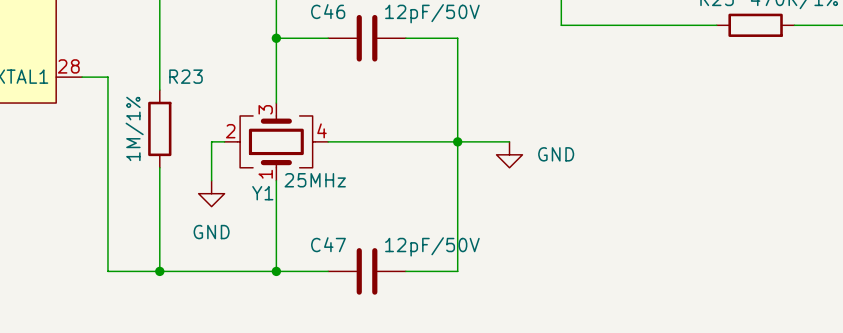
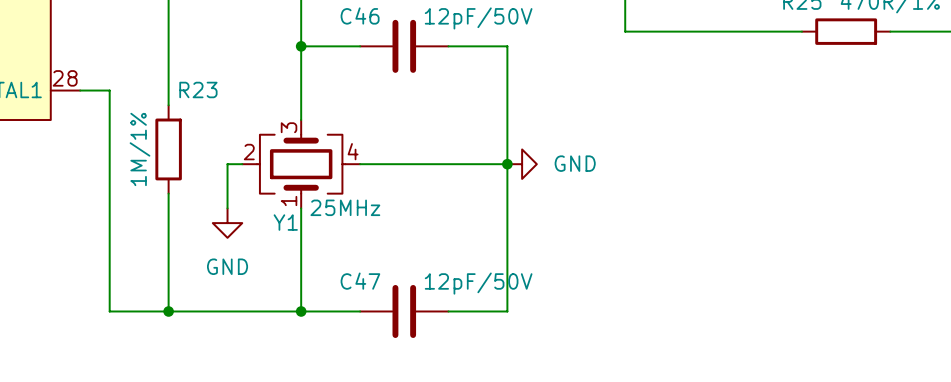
wire: (457, 141) (509, 141) -> none
power symbol rotation: 0° (509, 154) -> 90° counterclockwise (522, 164)
power symbol position: GND (509, 154) -> GND (522, 164)

